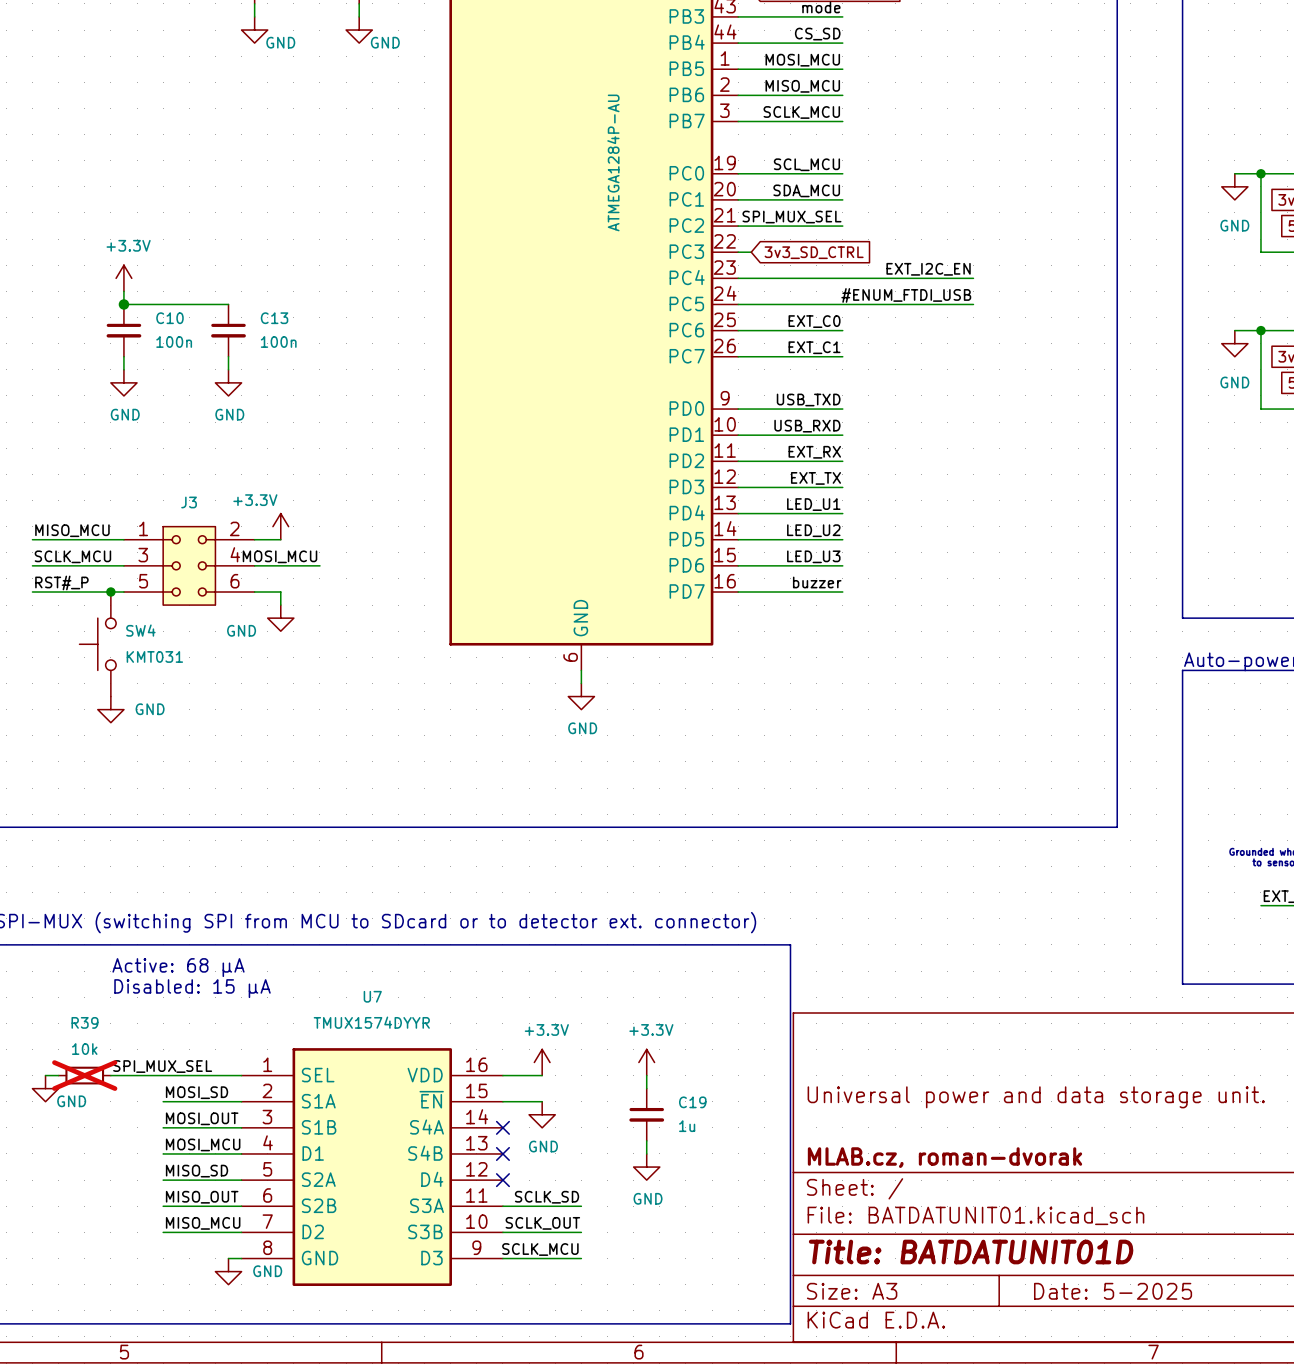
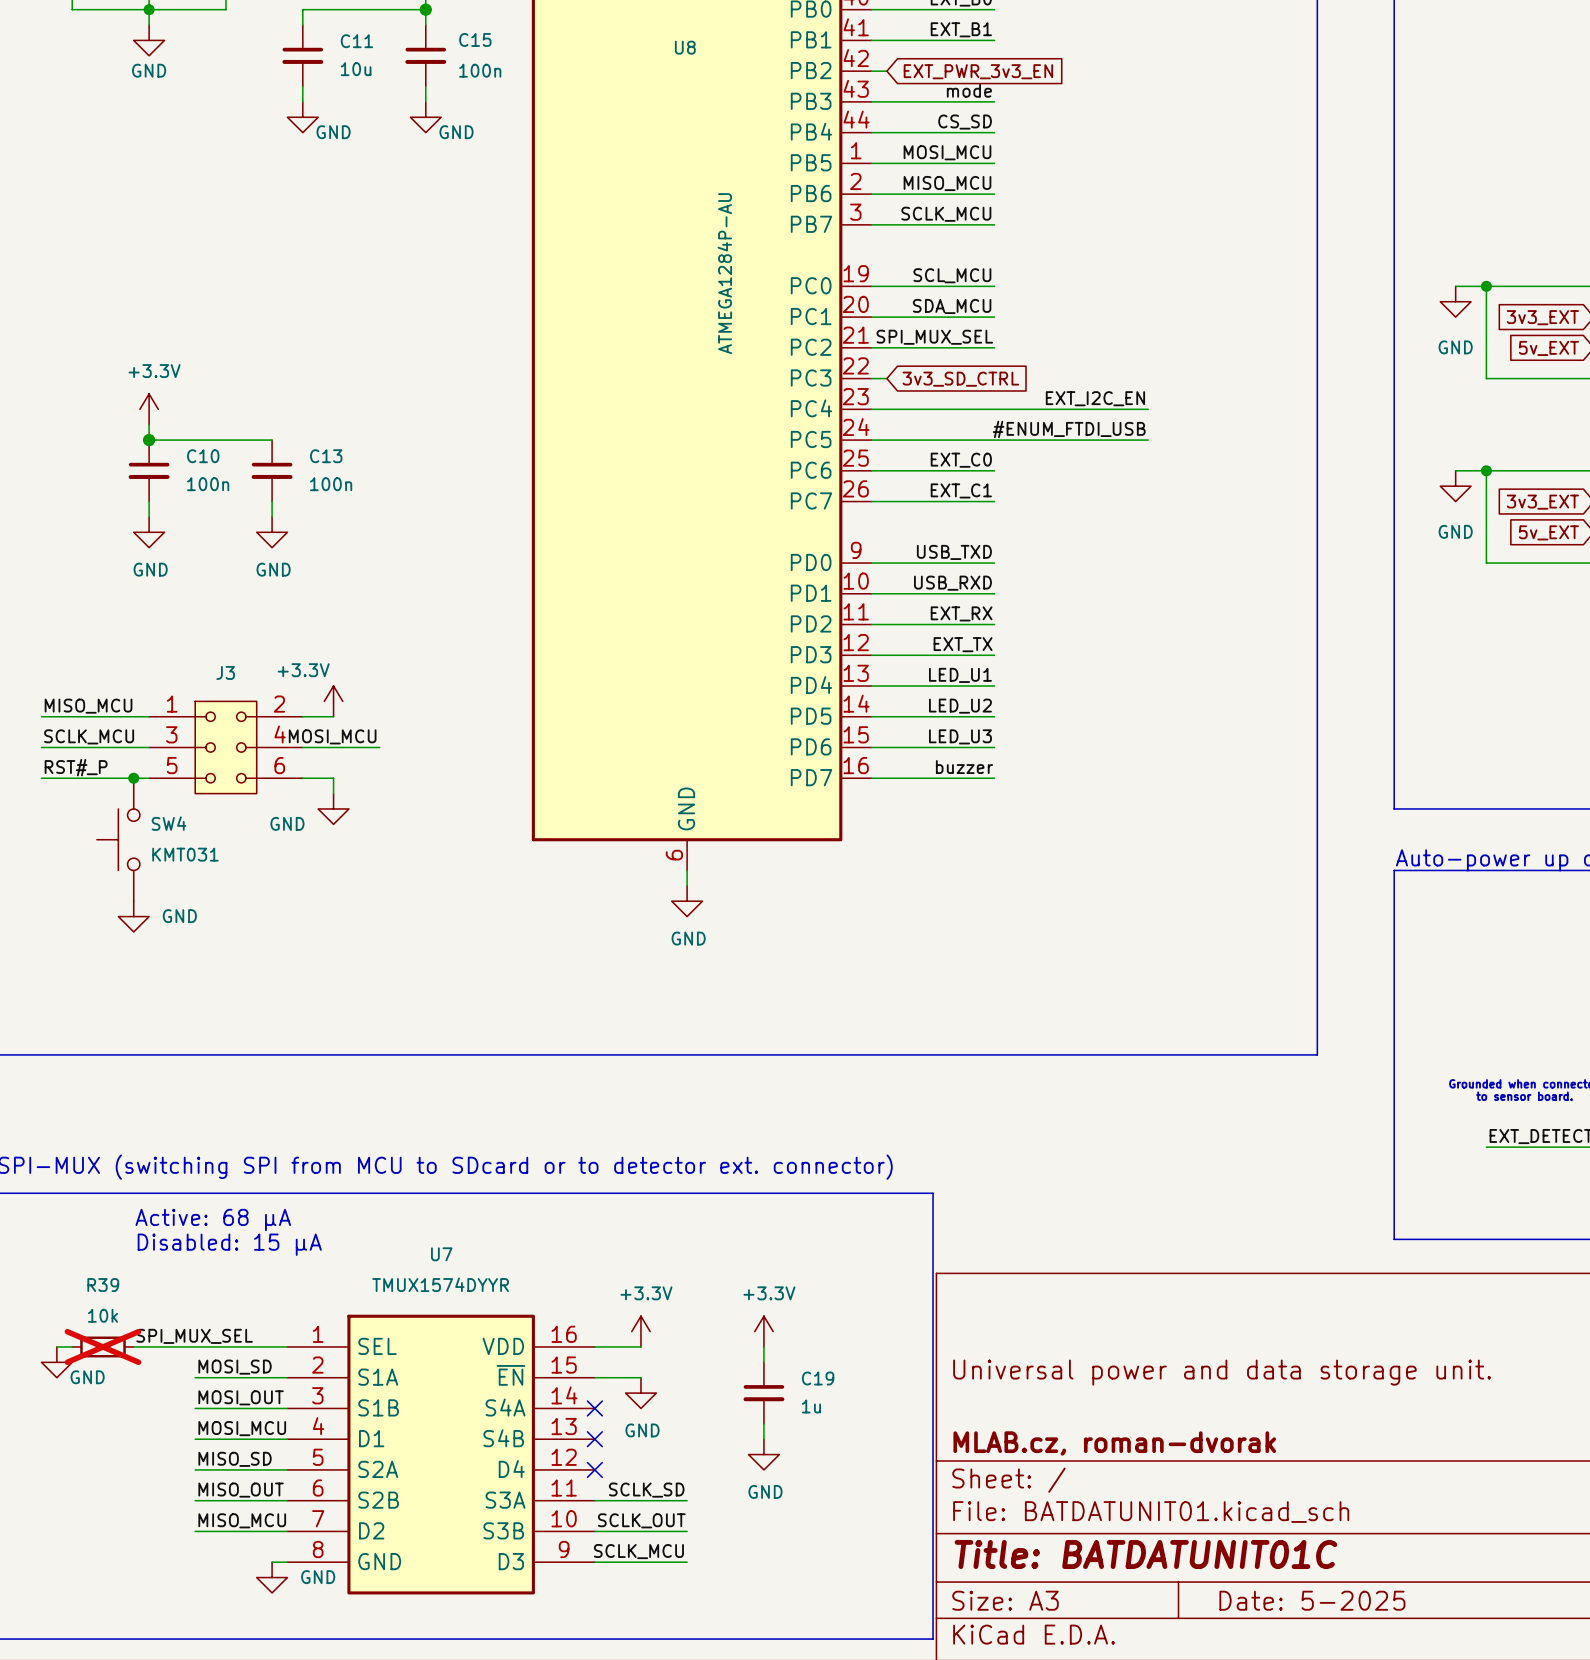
title block: Title: BATDATUNIT01D (971, 1252) -> Title: BATDATUNIT01C (1145, 1554)

